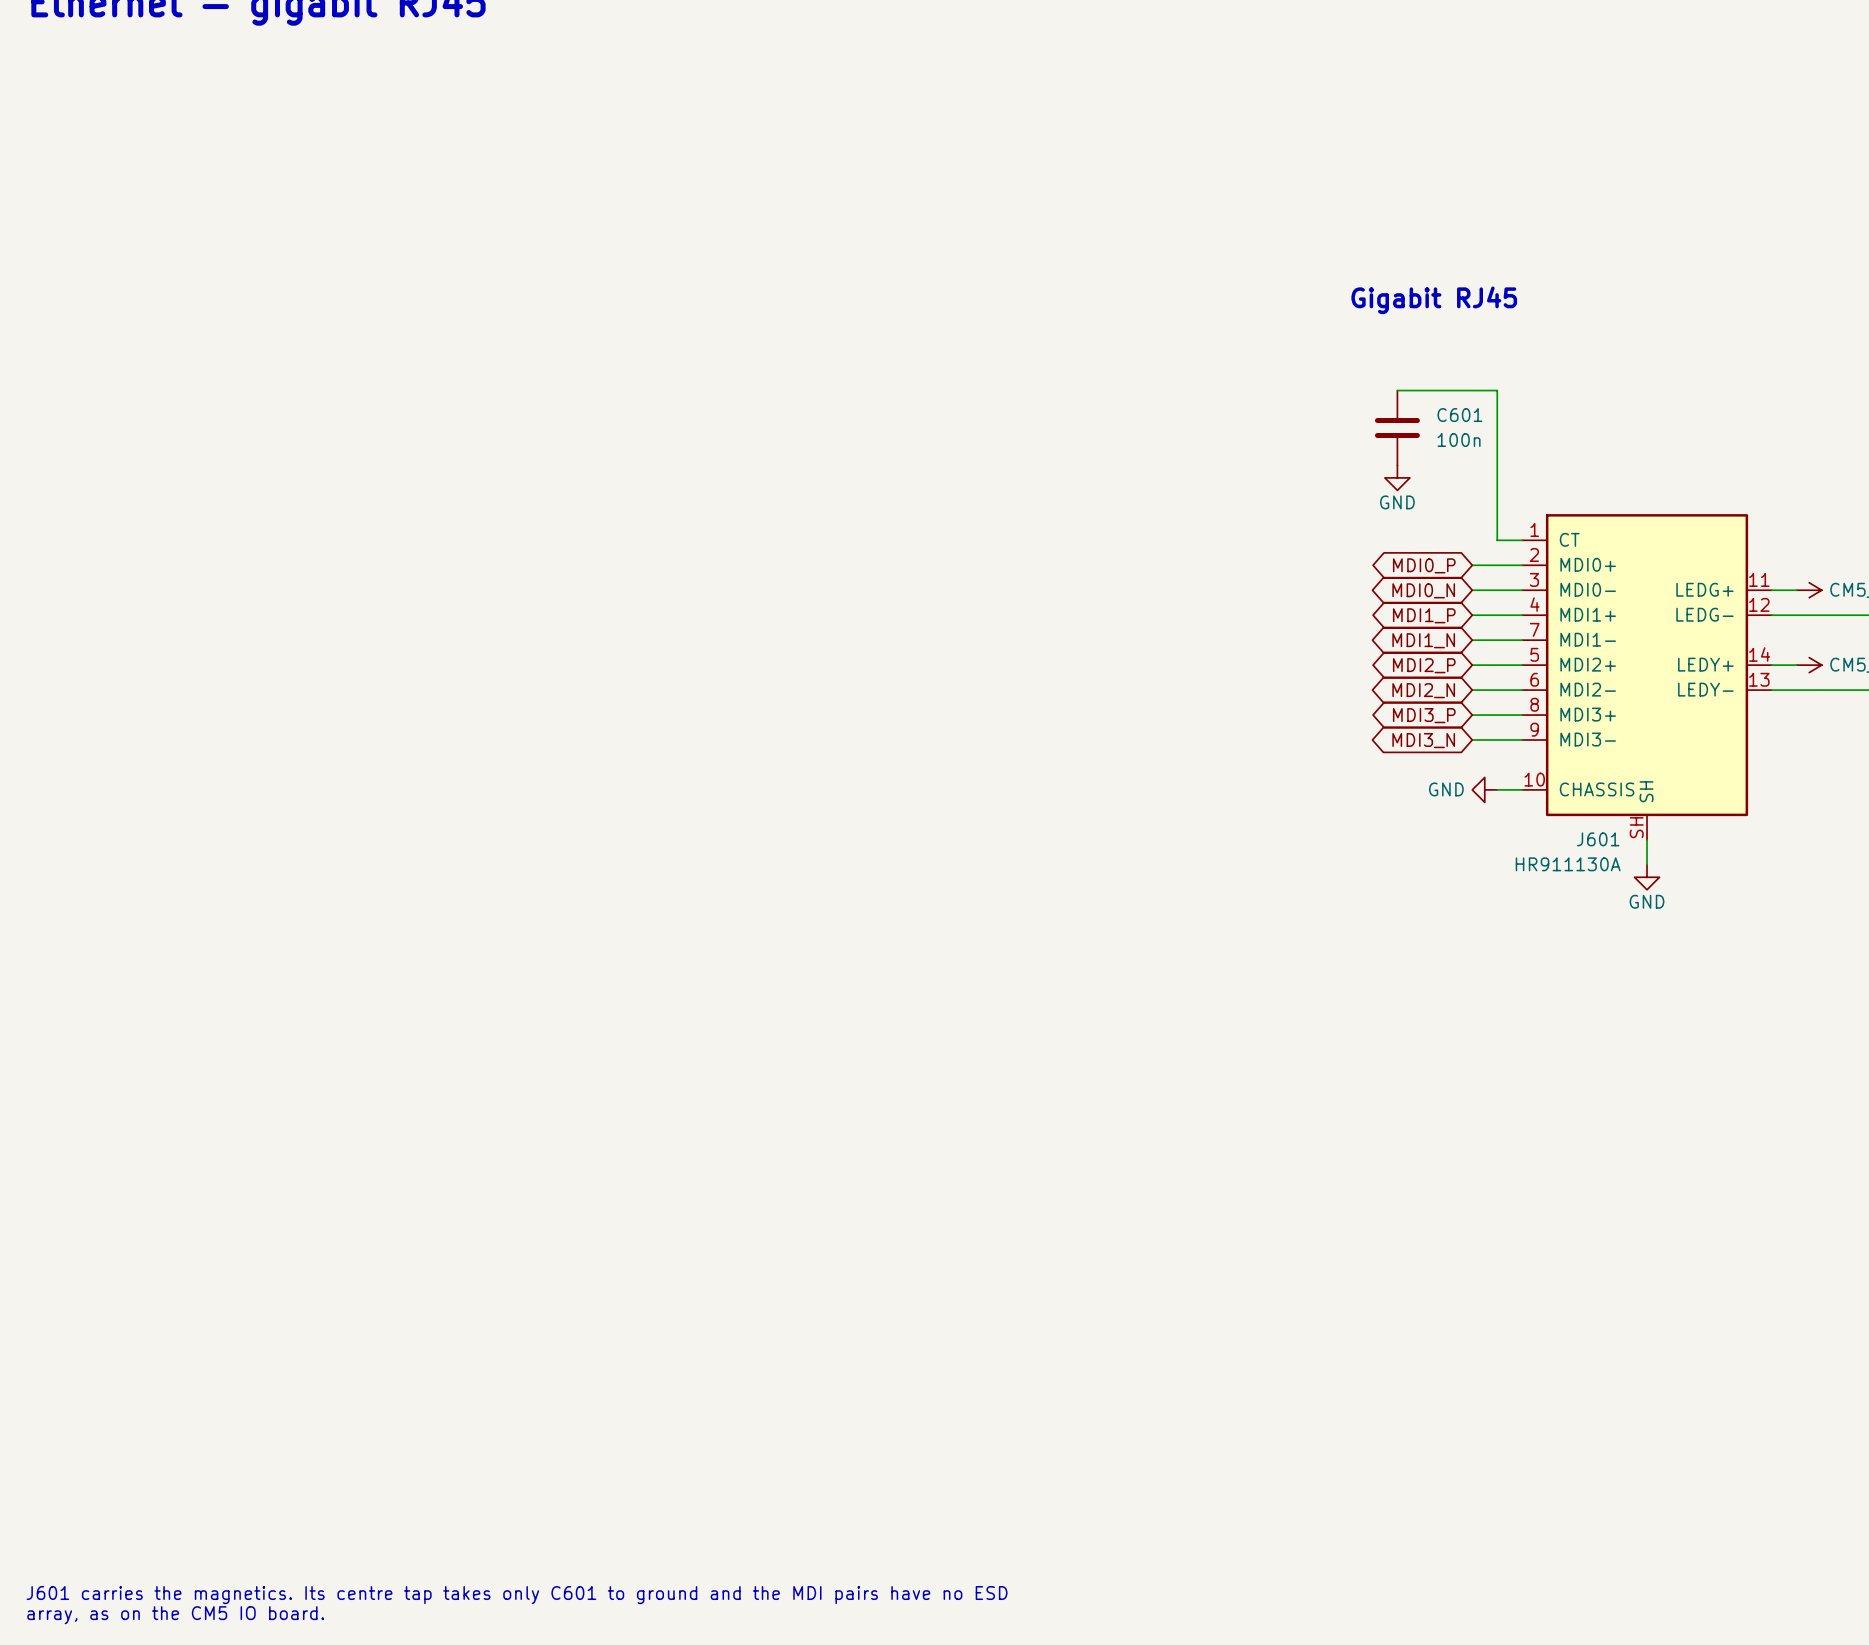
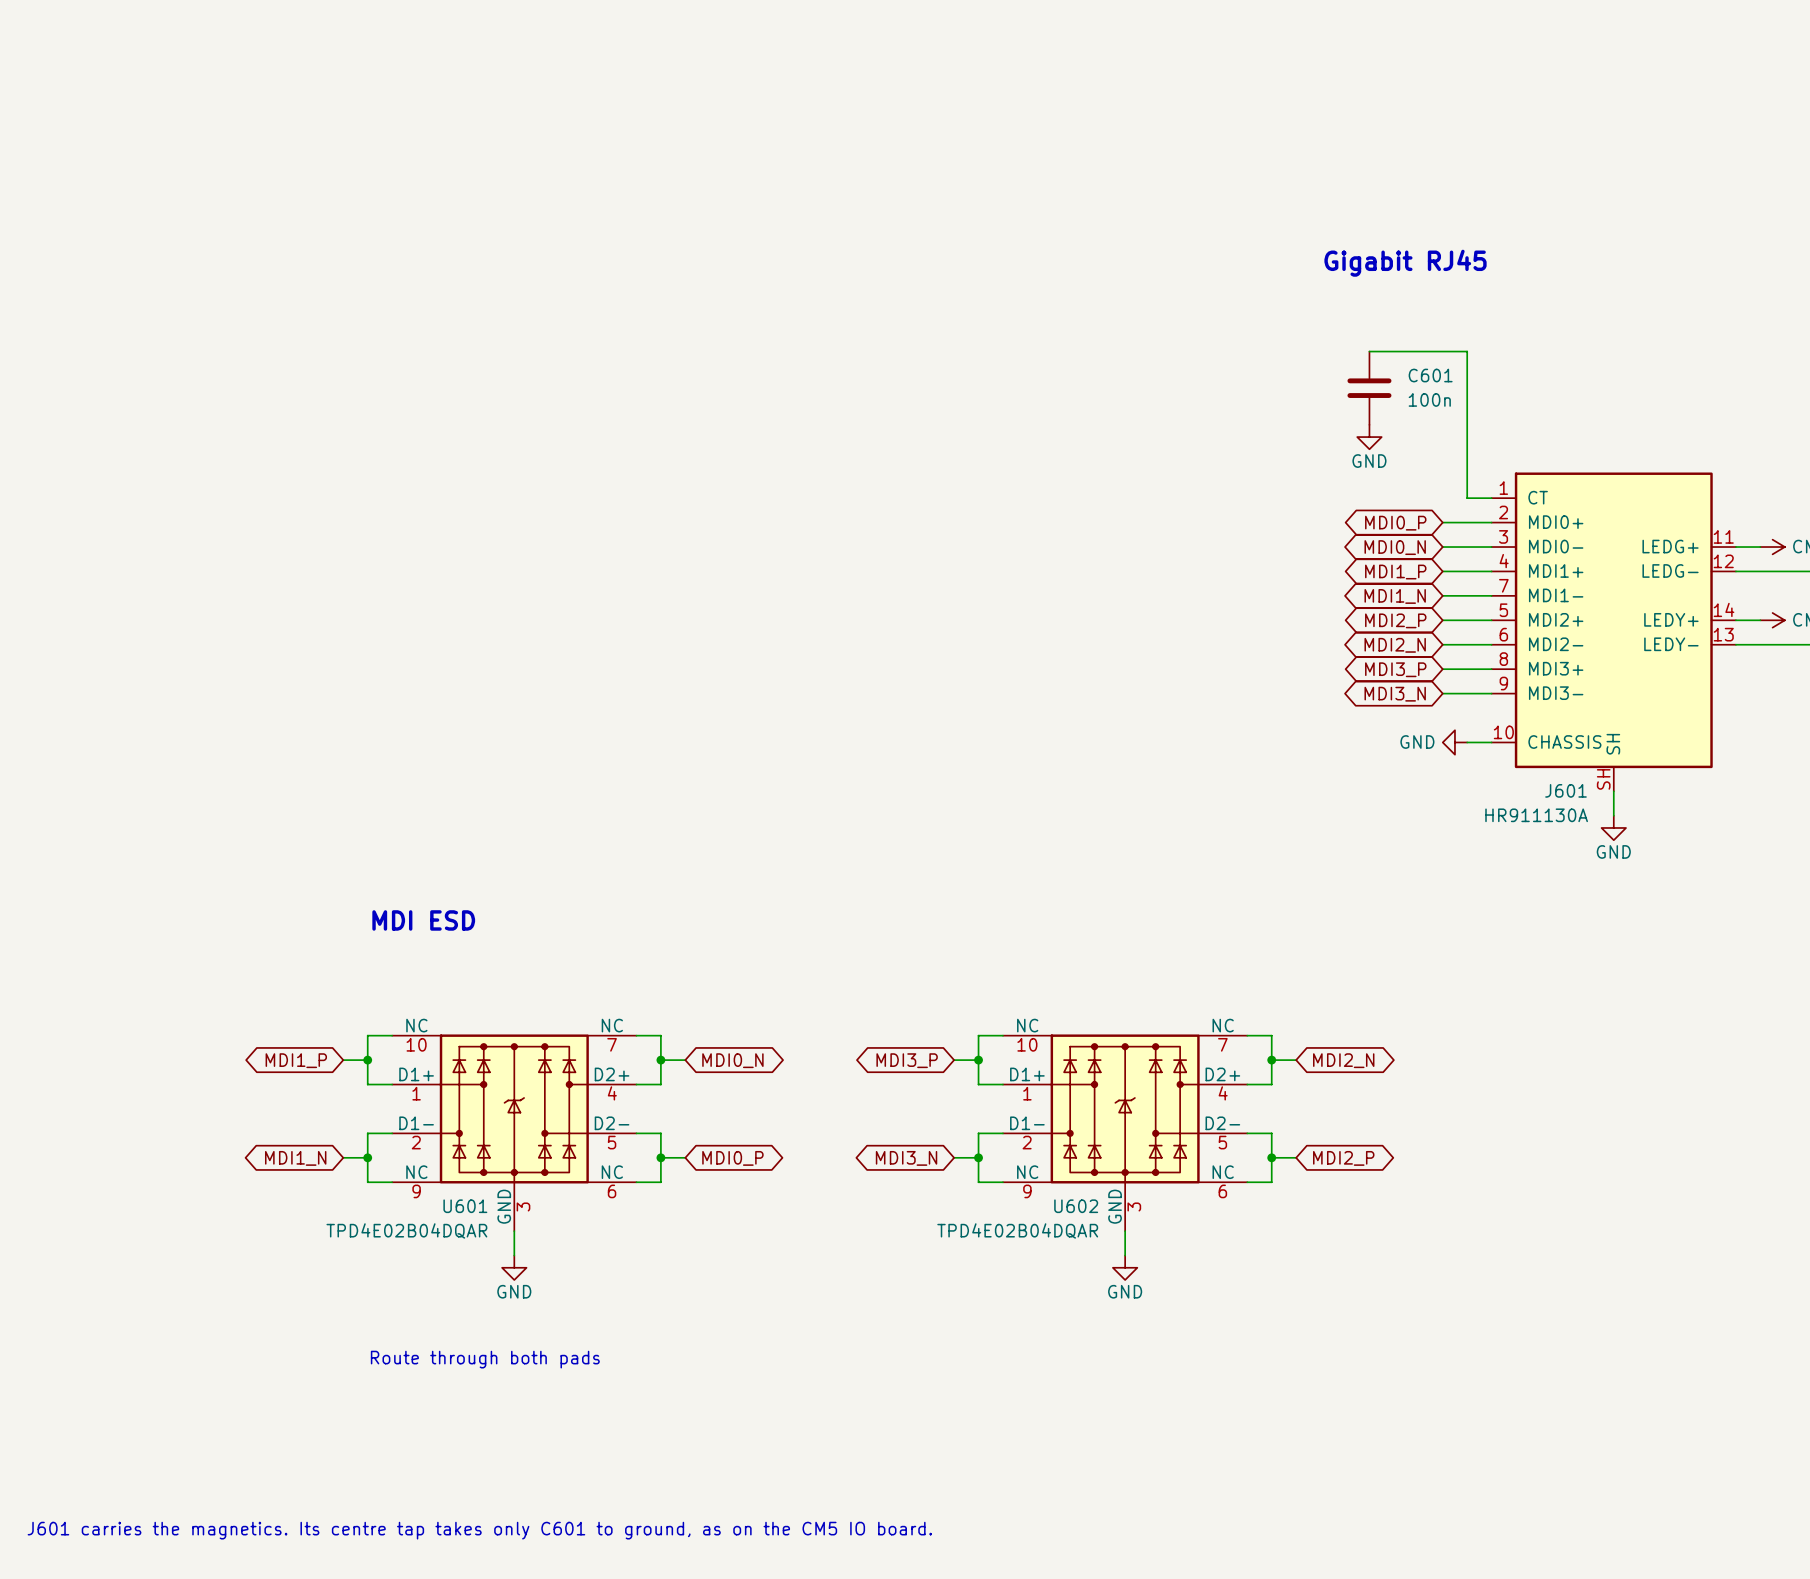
text: none -> MDI ESD (423, 920)
wire: none -> (392, 1035) (367, 1035) (367, 1084) (392, 1084)
wire: none -> (636, 1035) (660, 1035) (660, 1084) (636, 1084)
wire: none -> (1002, 1035) (978, 1035) (978, 1084) (1002, 1084)
wire: none -> (1247, 1035) (1271, 1035) (1271, 1084) (1247, 1084)
global label: none -> MDI1_P (296, 1060)
wire: none -> (343, 1060) (367, 1060)
junction: none -> (367, 1060)
wire: none -> (660, 1060) (685, 1060)
junction: none -> (660, 1060)
global label: none -> MDI0_N (732, 1060)
global label: none -> MDI3_P (907, 1060)
wire: none -> (954, 1060) (978, 1060)
junction: none -> (978, 1060)
wire: none -> (1271, 1060) (1296, 1060)
junction: none -> (1271, 1060)
global label: none -> MDI2_N (1343, 1060)
U601: none -> TPD4E02B04DQAR (514, 1132)
U602: none -> TPD4E02B04DQAR (1125, 1132)
wire: none -> (392, 1133) (367, 1133) (367, 1182) (392, 1182)
wire: none -> (636, 1133) (660, 1133) (660, 1182) (636, 1182)
wire: none -> (1002, 1133) (978, 1133) (978, 1182) (1002, 1182)
wire: none -> (1247, 1133) (1271, 1133) (1271, 1182) (1247, 1182)
global label: none -> MDI1_N (295, 1158)
wire: none -> (343, 1157) (367, 1157)
junction: none -> (367, 1157)
wire: none -> (660, 1157) (685, 1157)
junction: none -> (660, 1157)
global label: none -> MDI0_P (732, 1158)
global label: none -> MDI3_N (906, 1158)
wire: none -> (954, 1157) (978, 1157)
junction: none -> (978, 1157)
wire: none -> (1271, 1157) (1296, 1157)
junction: none -> (1271, 1157)
global label: none -> MDI2_P (1343, 1158)
wire: none -> (514, 1231) (514, 1255)
wire: none -> (1125, 1231) (1125, 1255)
power symbol: none -> GND (514, 1267)
power symbol: none -> GND (1125, 1267)
text: none -> Route through both pads (485, 1359)
text: J601 carries the magnetics. Its centre tap takes only C601 to ground and the MDI pairs have no ESD (517, 1595) -> J601 carries the magnetics. Its centre tap takes only C601 to ground, as on the CM5 IO board. (479, 1530)
text: array, as on the CM5 IO board. (175, 1615) -> none

